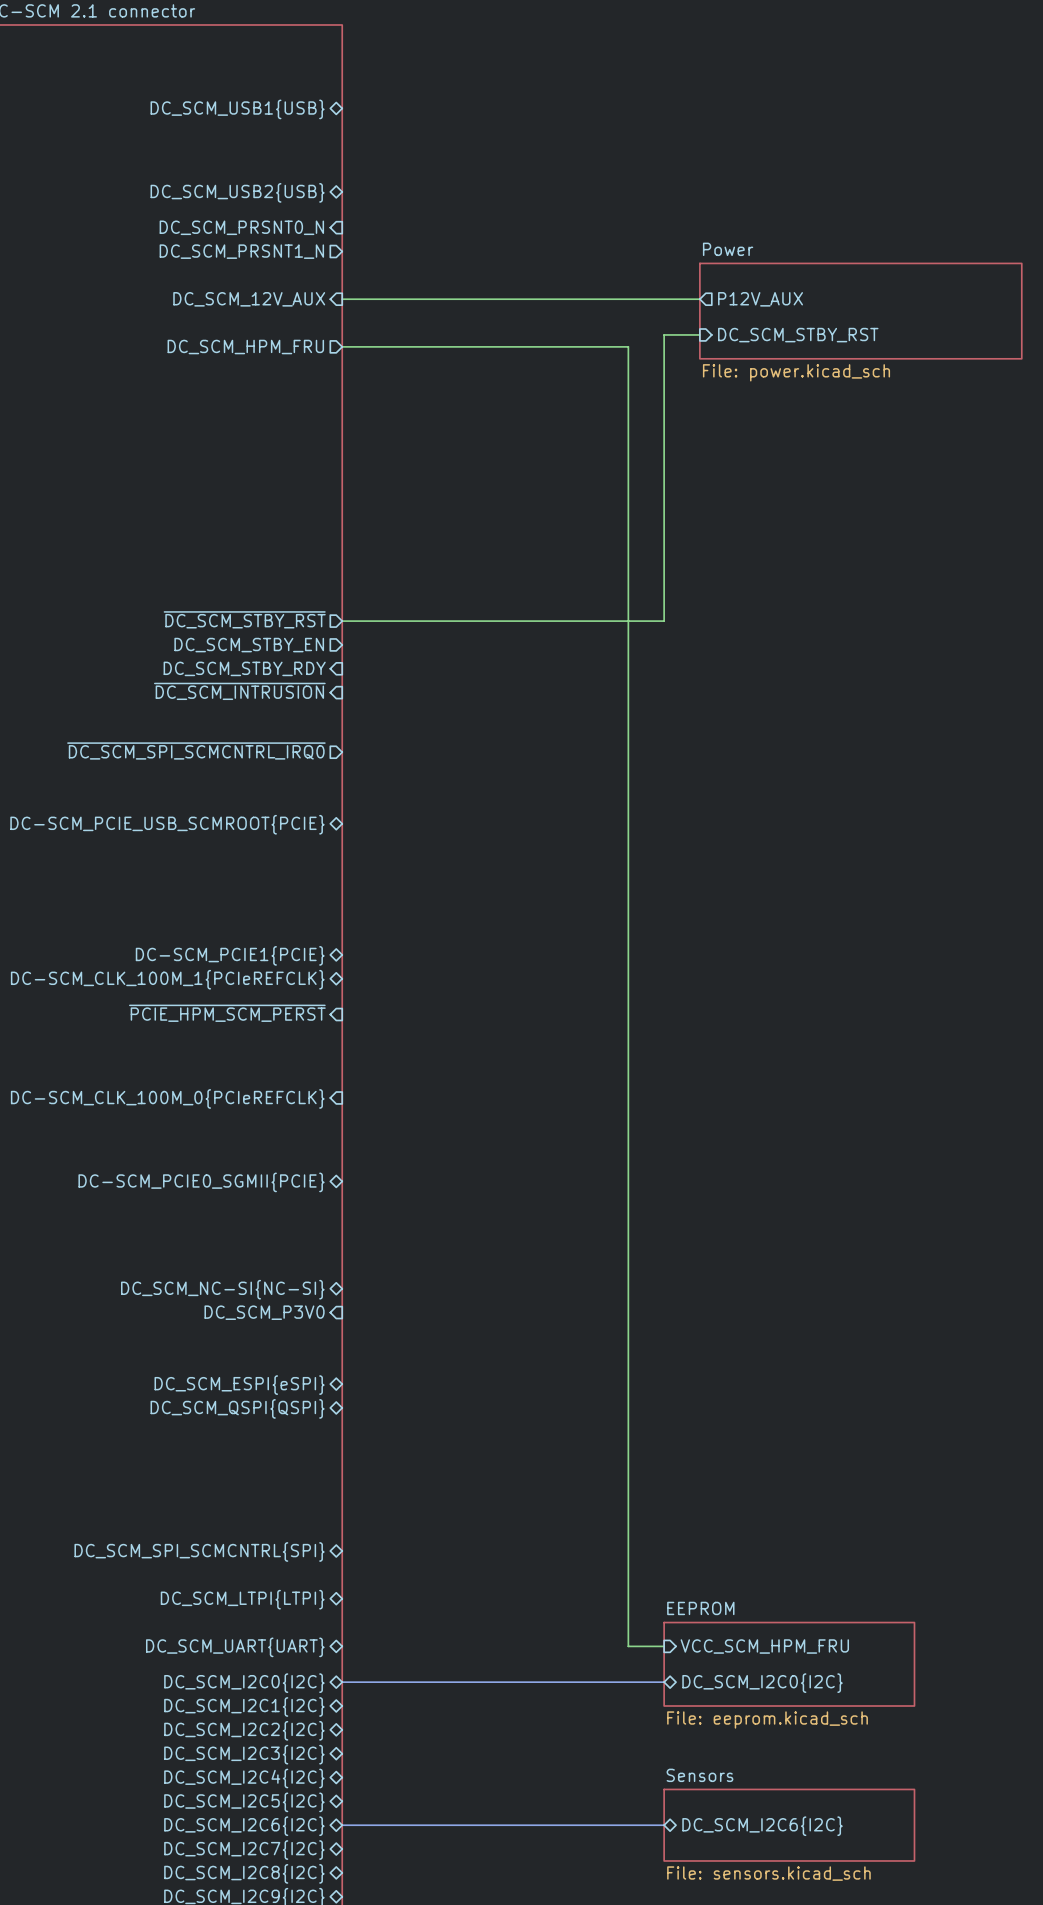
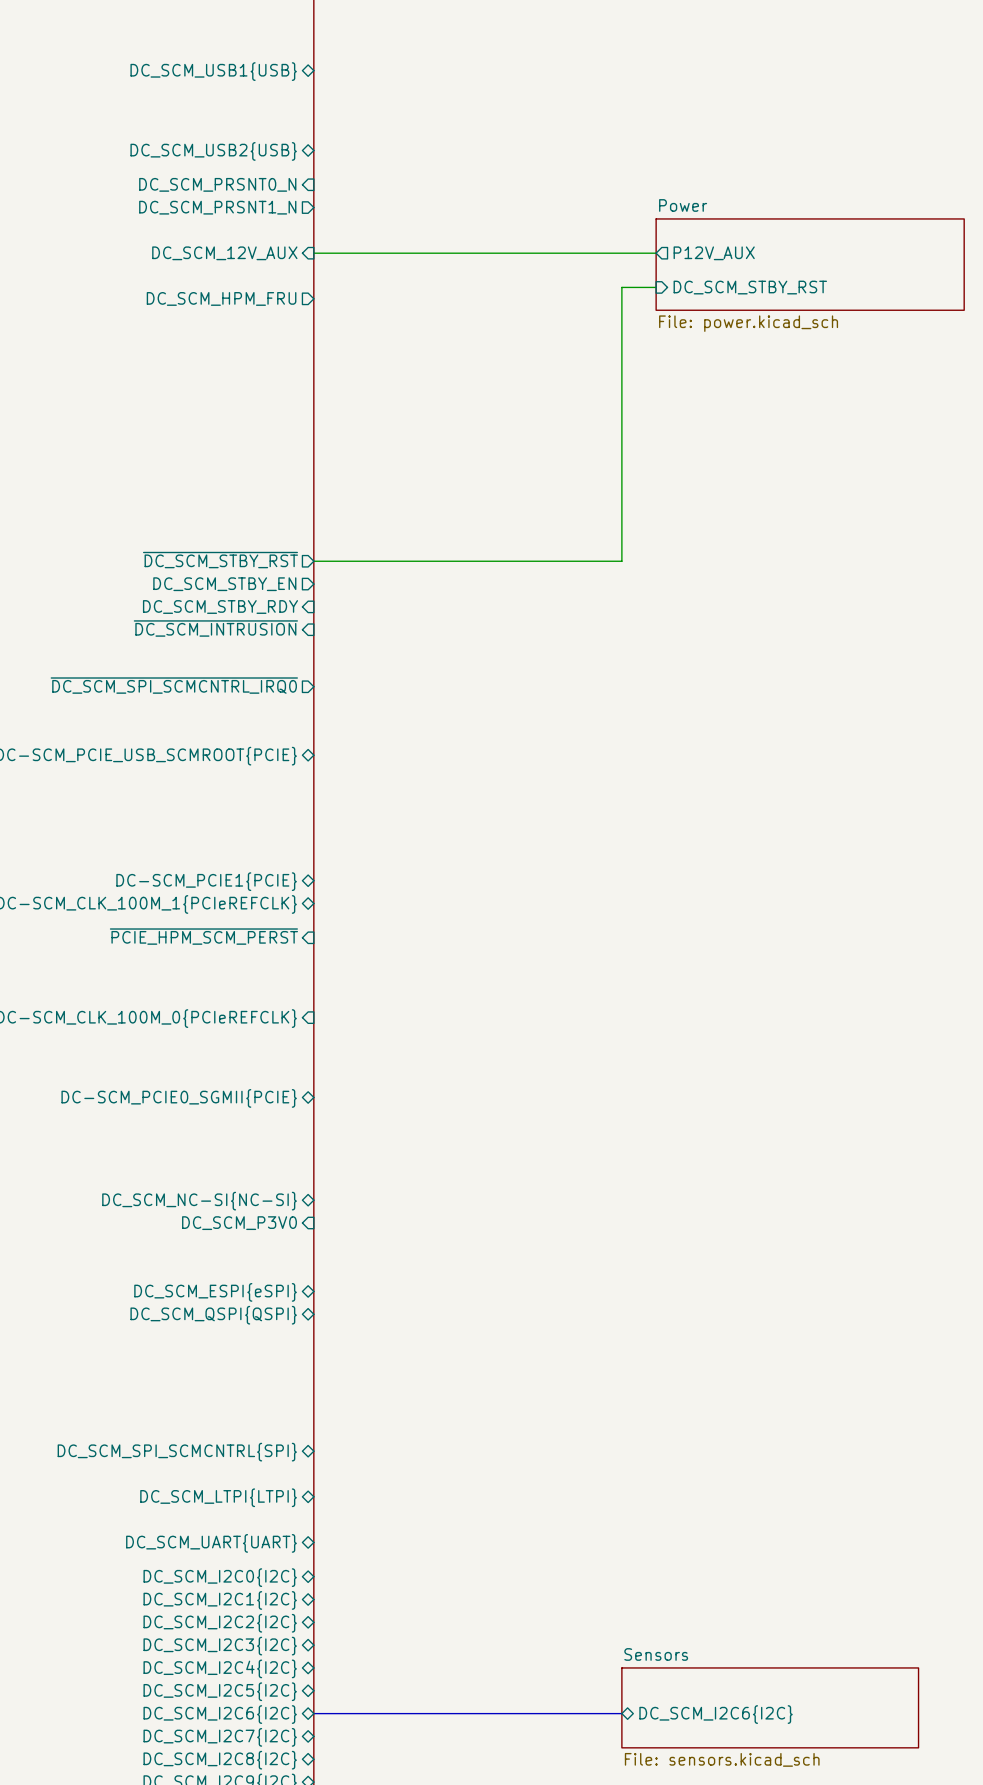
wire: (342, 346) (628, 346) (628, 1646) (664, 1646) -> none
sheet pin: VCC_SCM_HPM_FRU (764, 1646) -> none
sheet EEPROM: File: eeprom.kicad_sch (789, 1664) -> none
bus: (342, 1682) (664, 1682) -> none
sheet pin: DC_SCM_I2C0{I2C} (762, 1683) -> none
sheet Sensors: none -> File: sensors.kicad_sch (770, 1707)
sheet Sensors: File: sensors.kicad_sch (789, 1825) -> none

